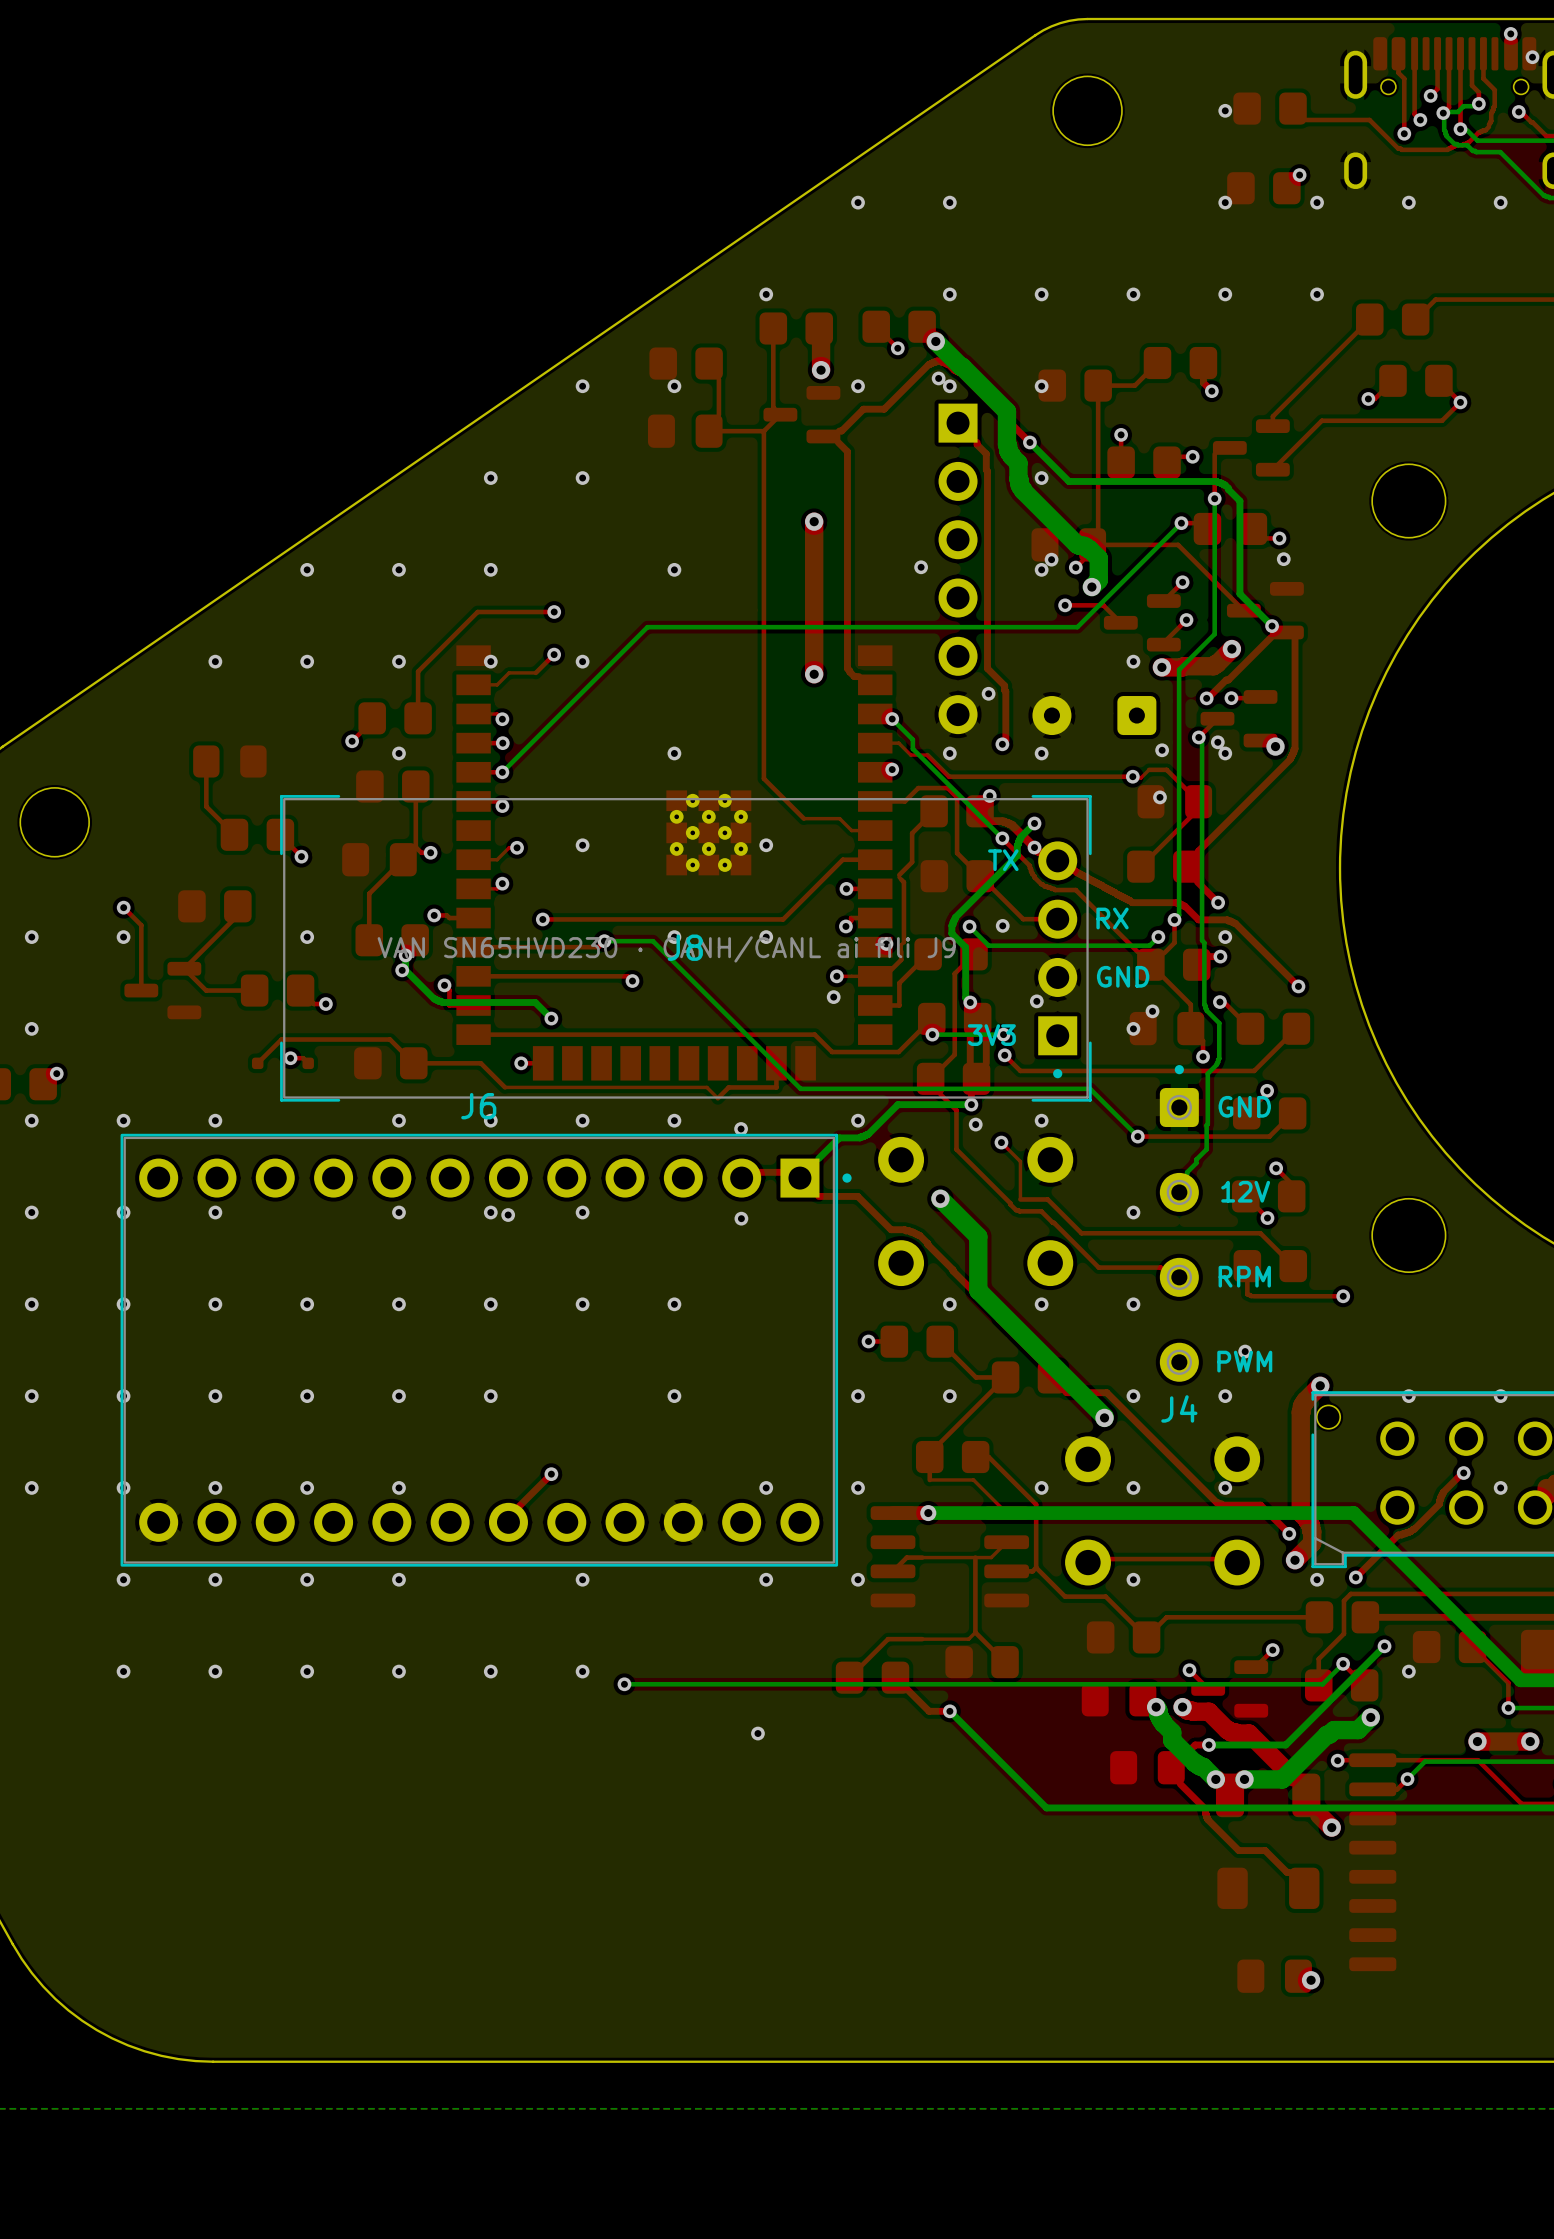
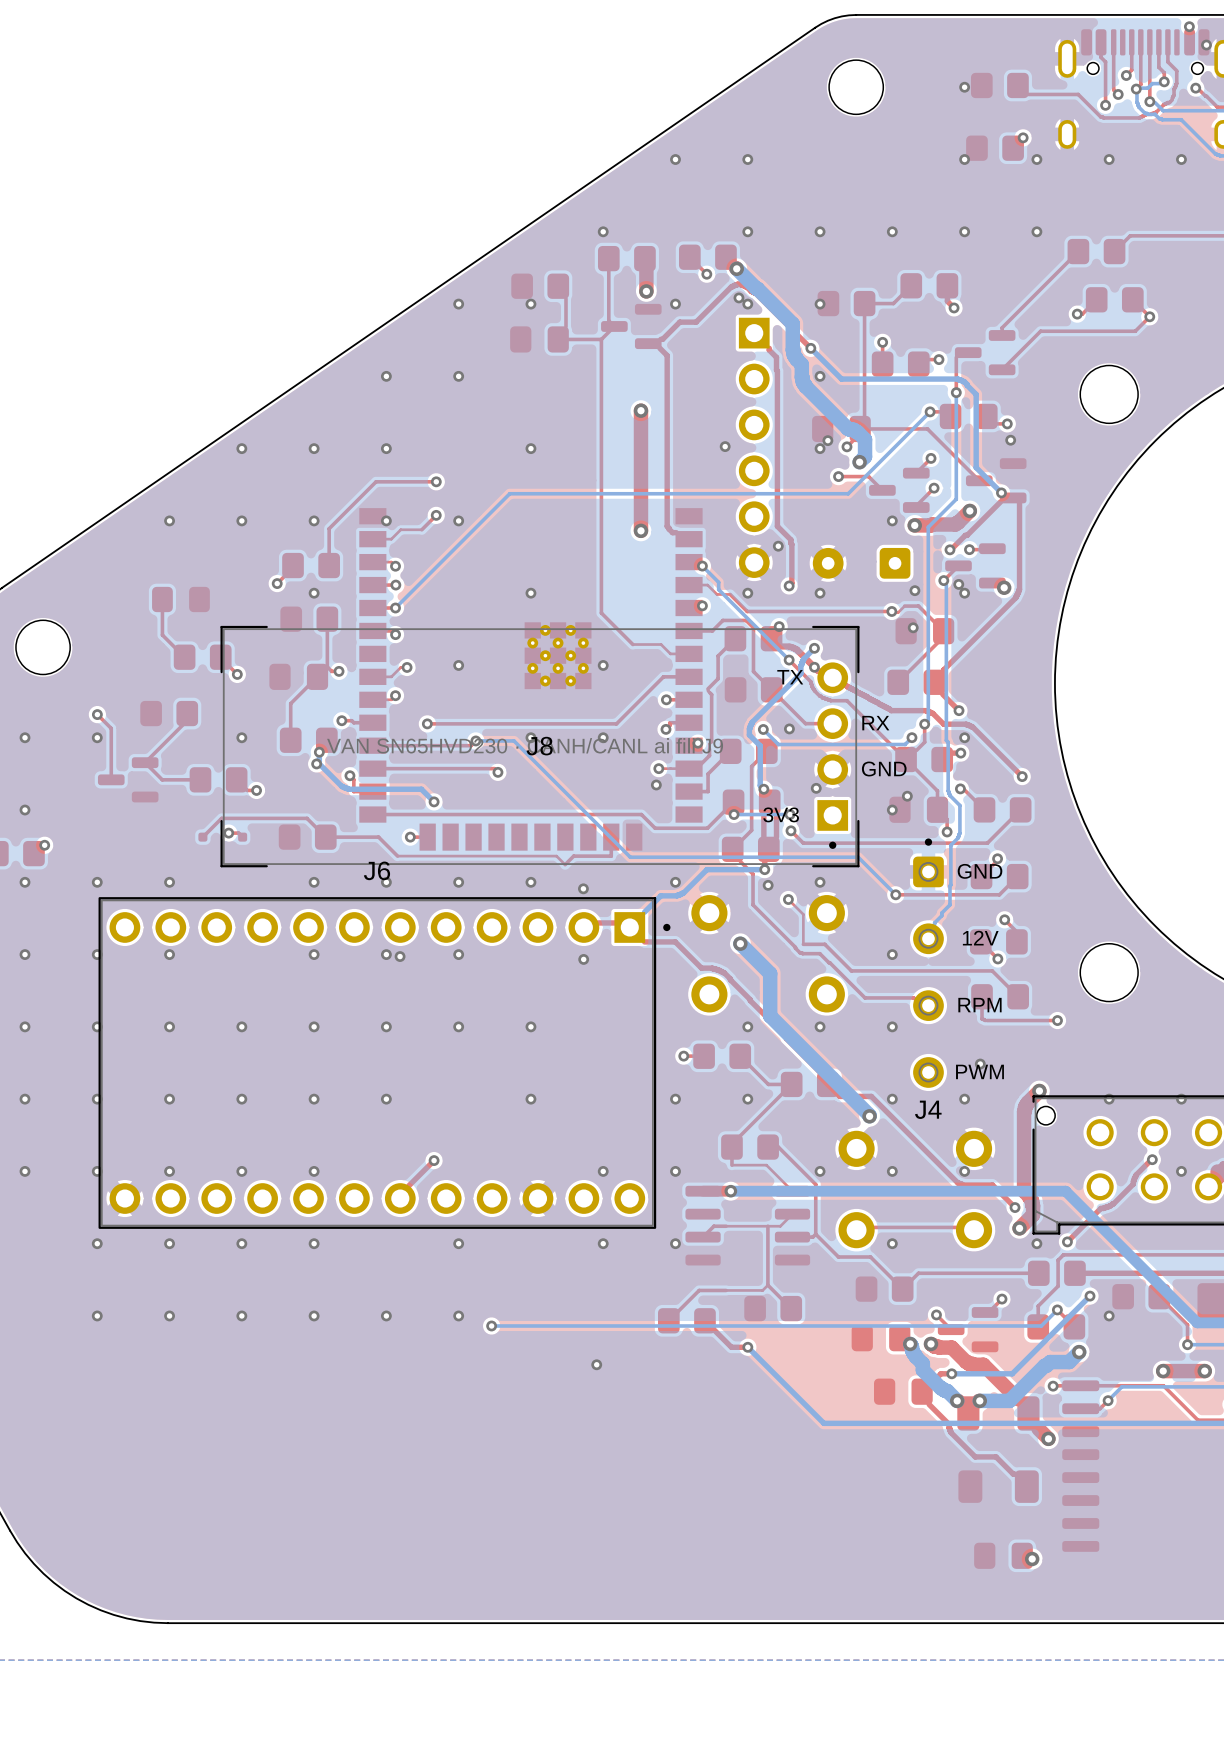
J6 footprint: [120, 1133, 839, 1567] -> [98, 897, 657, 1229]

